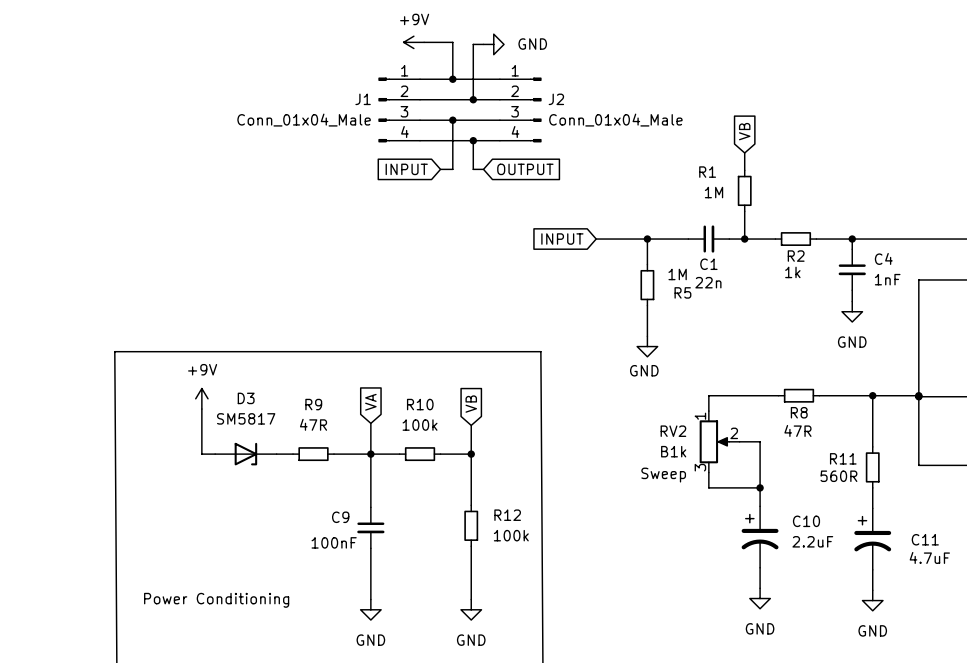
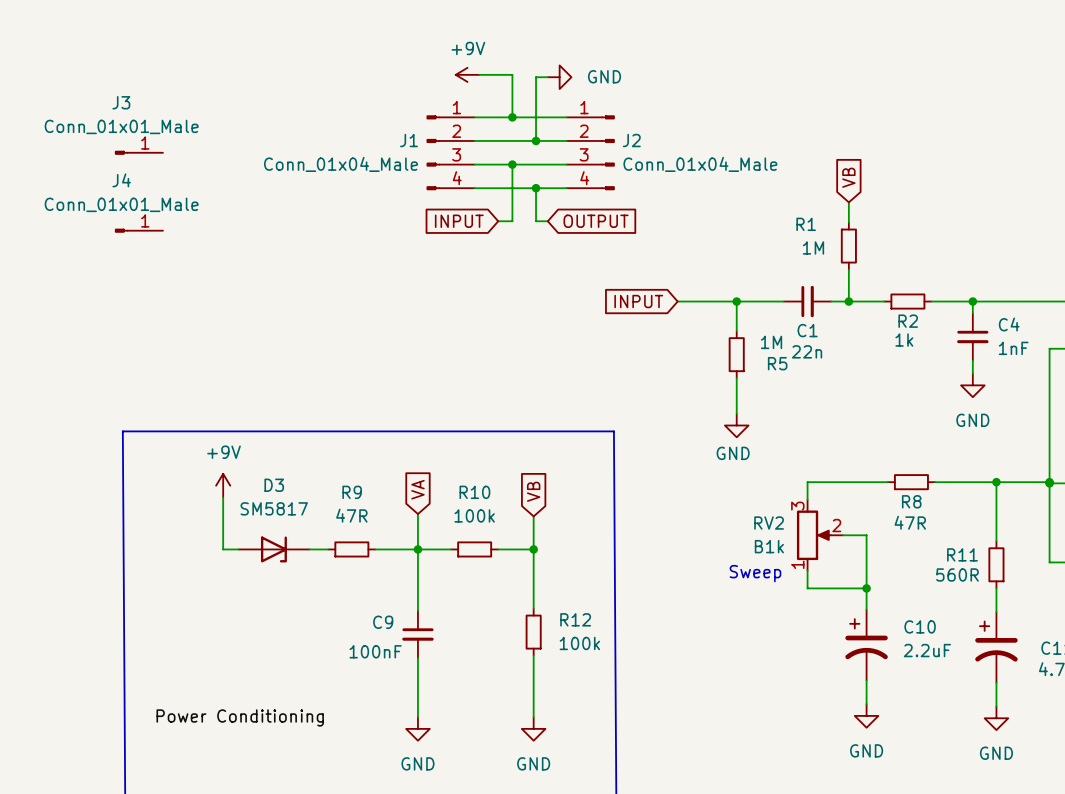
J3: none -> Conn_01x01_Male (139, 152)
J4: none -> Conn_01x01_Male (139, 230)
RV2 flip: as is (714, 441) -> up-down (814, 535)

